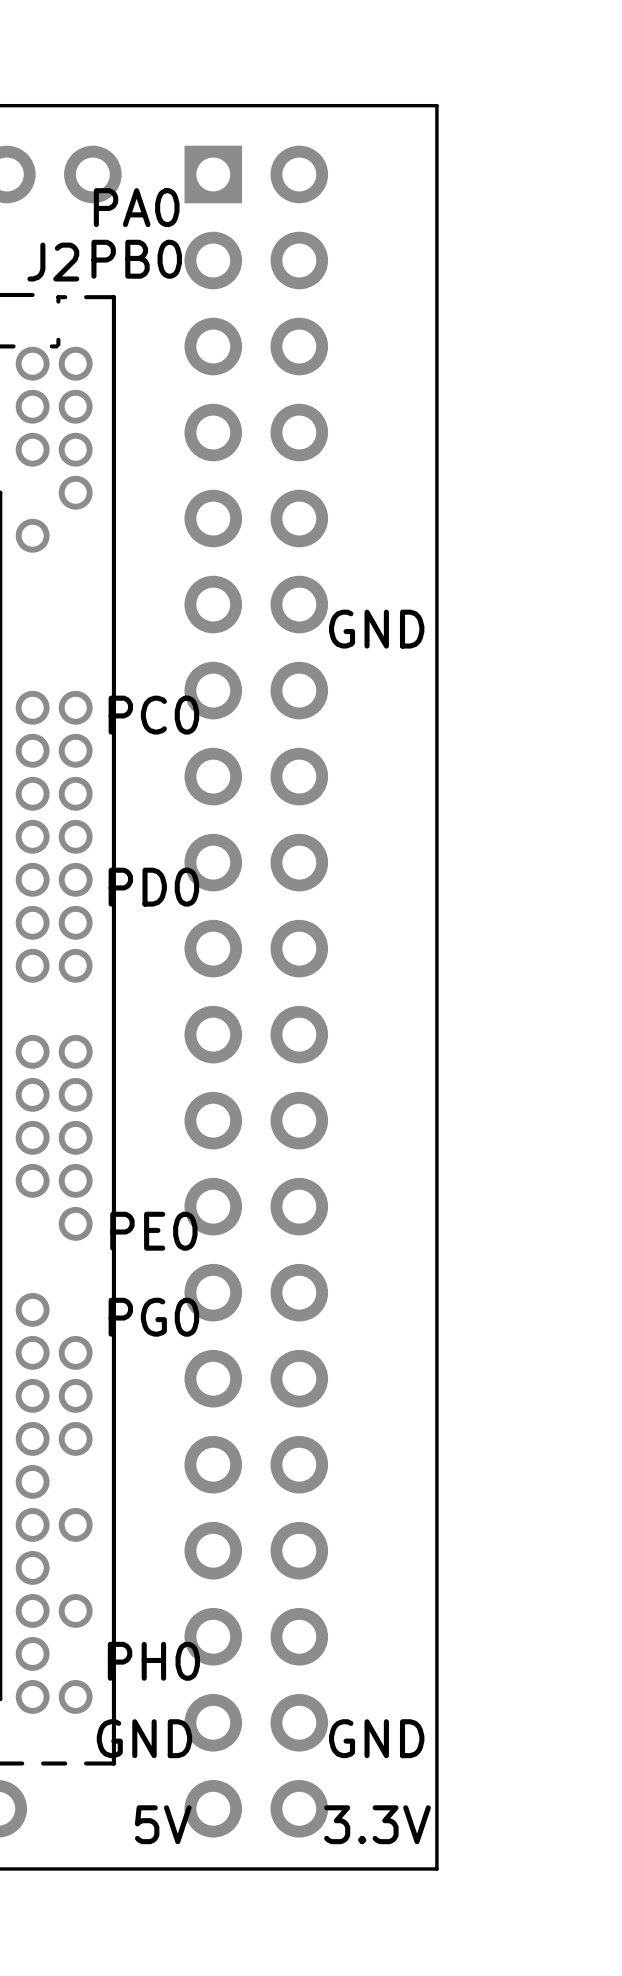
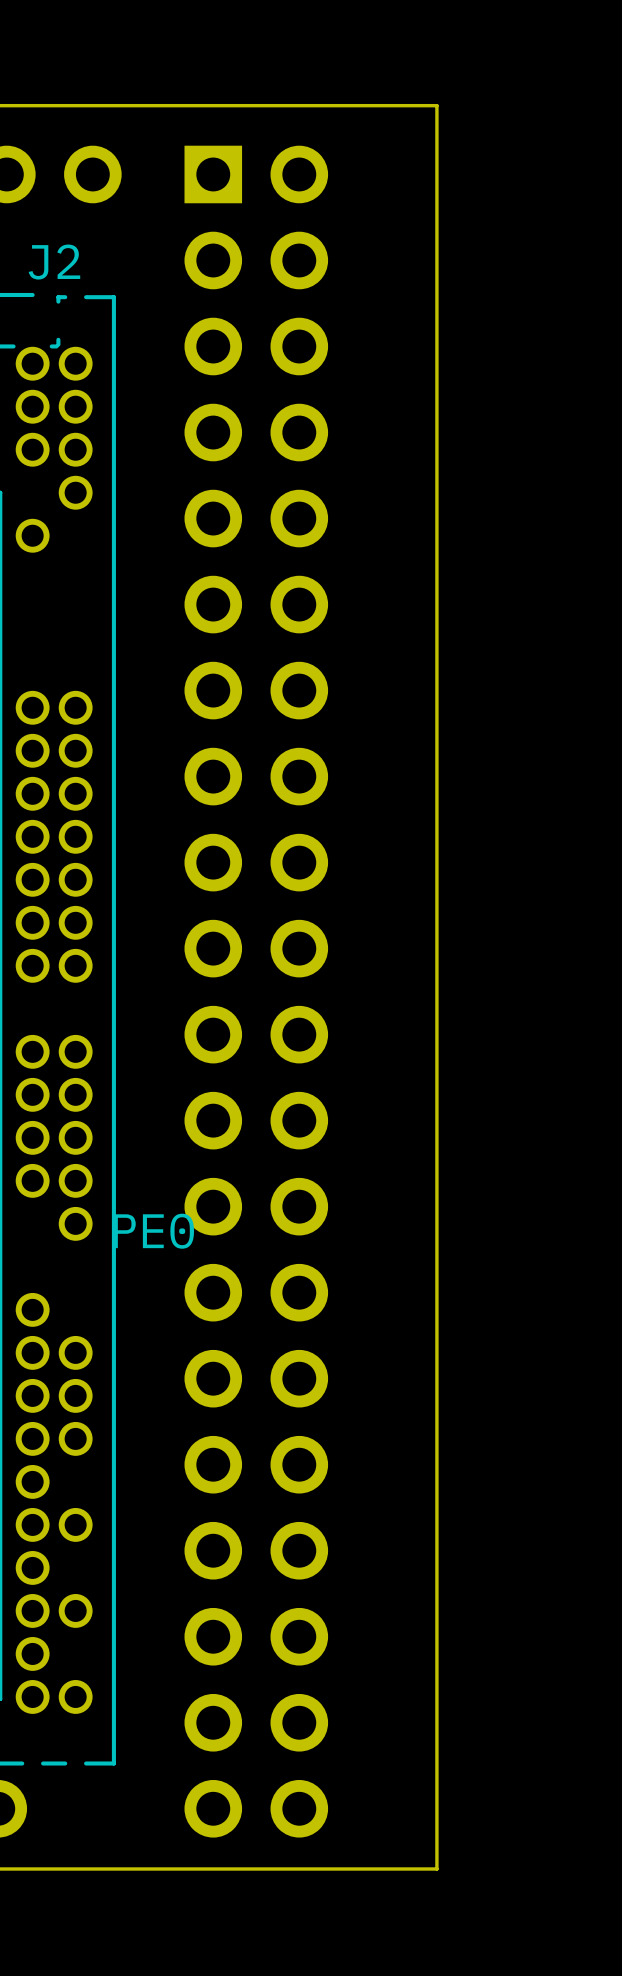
text: PA0 (136, 207) -> none
text: PB0 (136, 259) -> none
text: GND (376, 629) -> none
text: PC0 (153, 715) -> none
text: PD0 (153, 887) -> none
text: PG0 (153, 1317) -> none
text: PH0 (153, 1661) -> none
text: GND (144, 1738) -> none
text: GND (376, 1738) -> none
text: 5V (163, 1824) -> none
text: 3.3V (377, 1824) -> none

